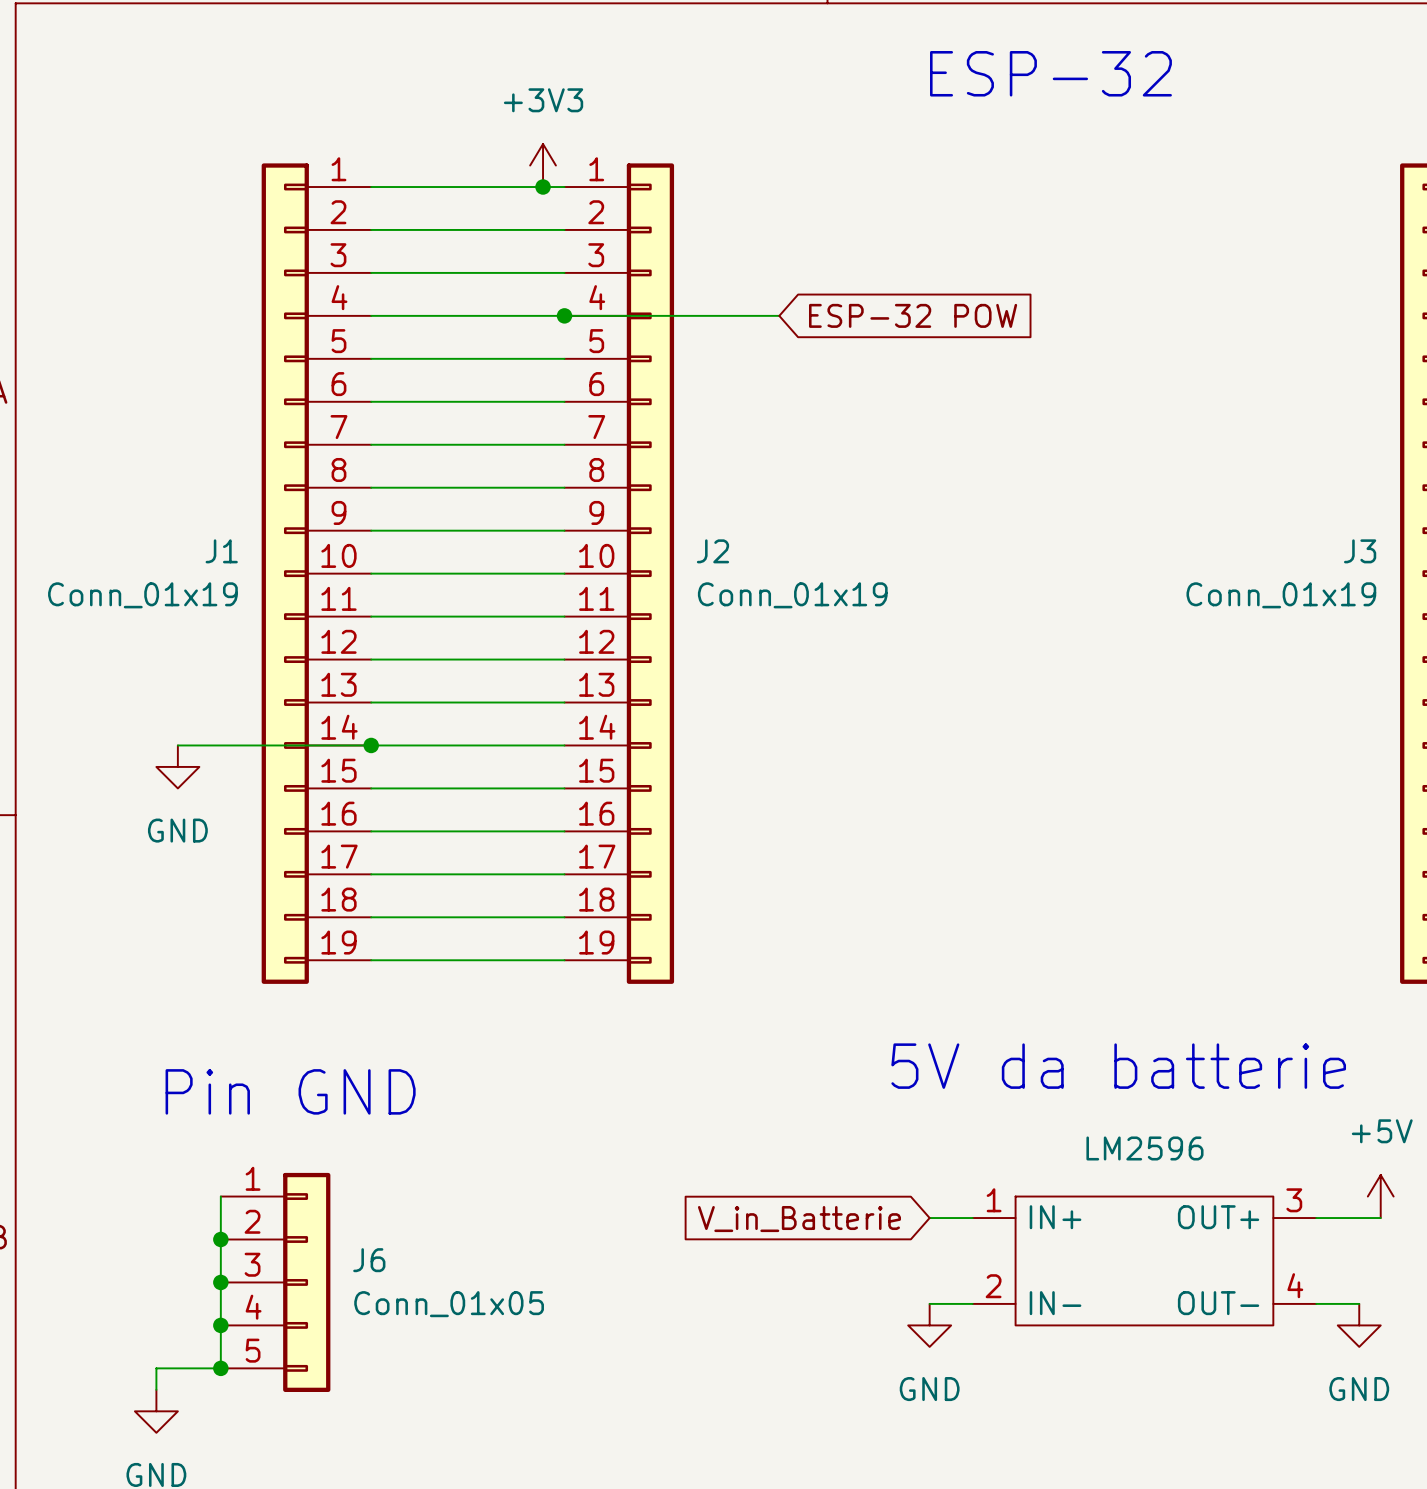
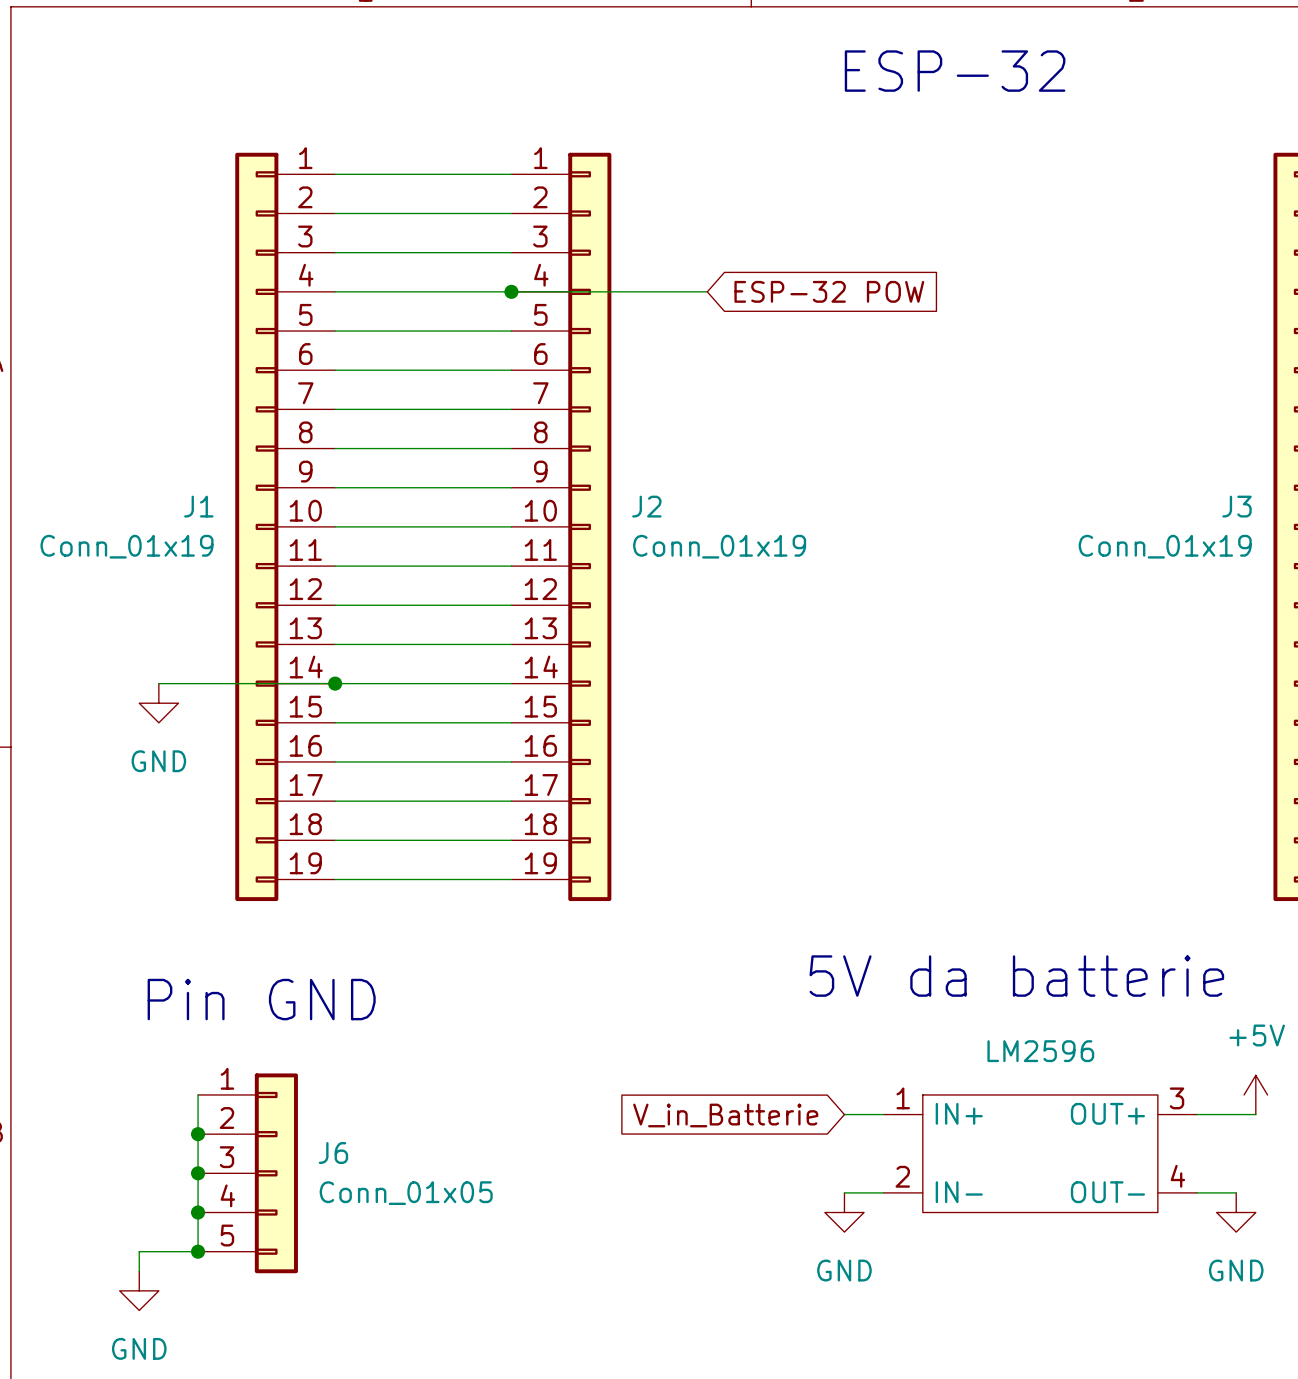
power symbol: +3V3 (543, 165) -> none
junction: (543, 187) -> none

